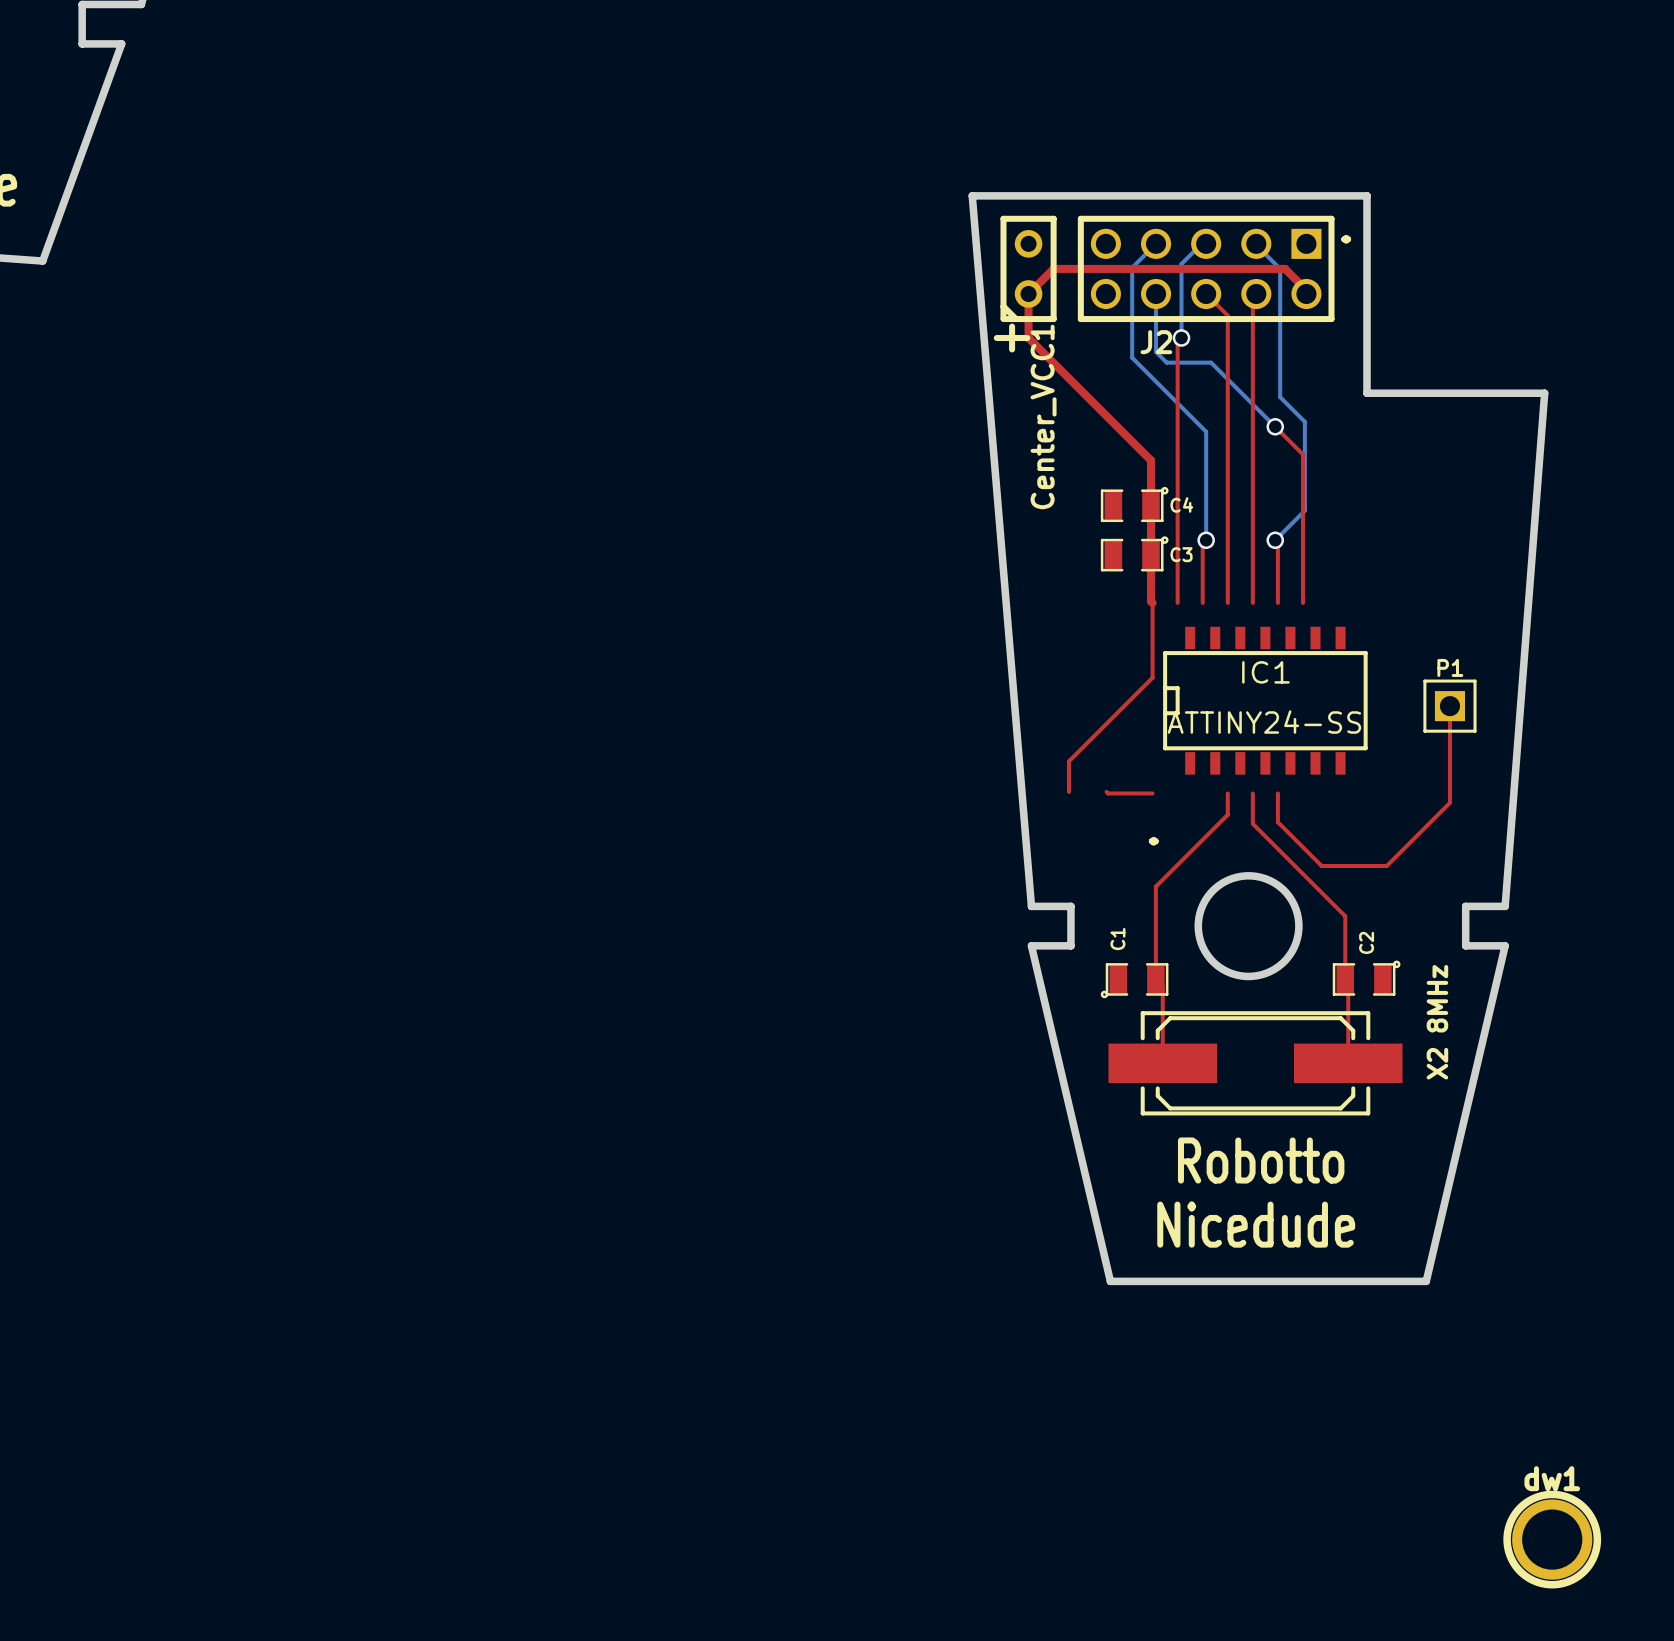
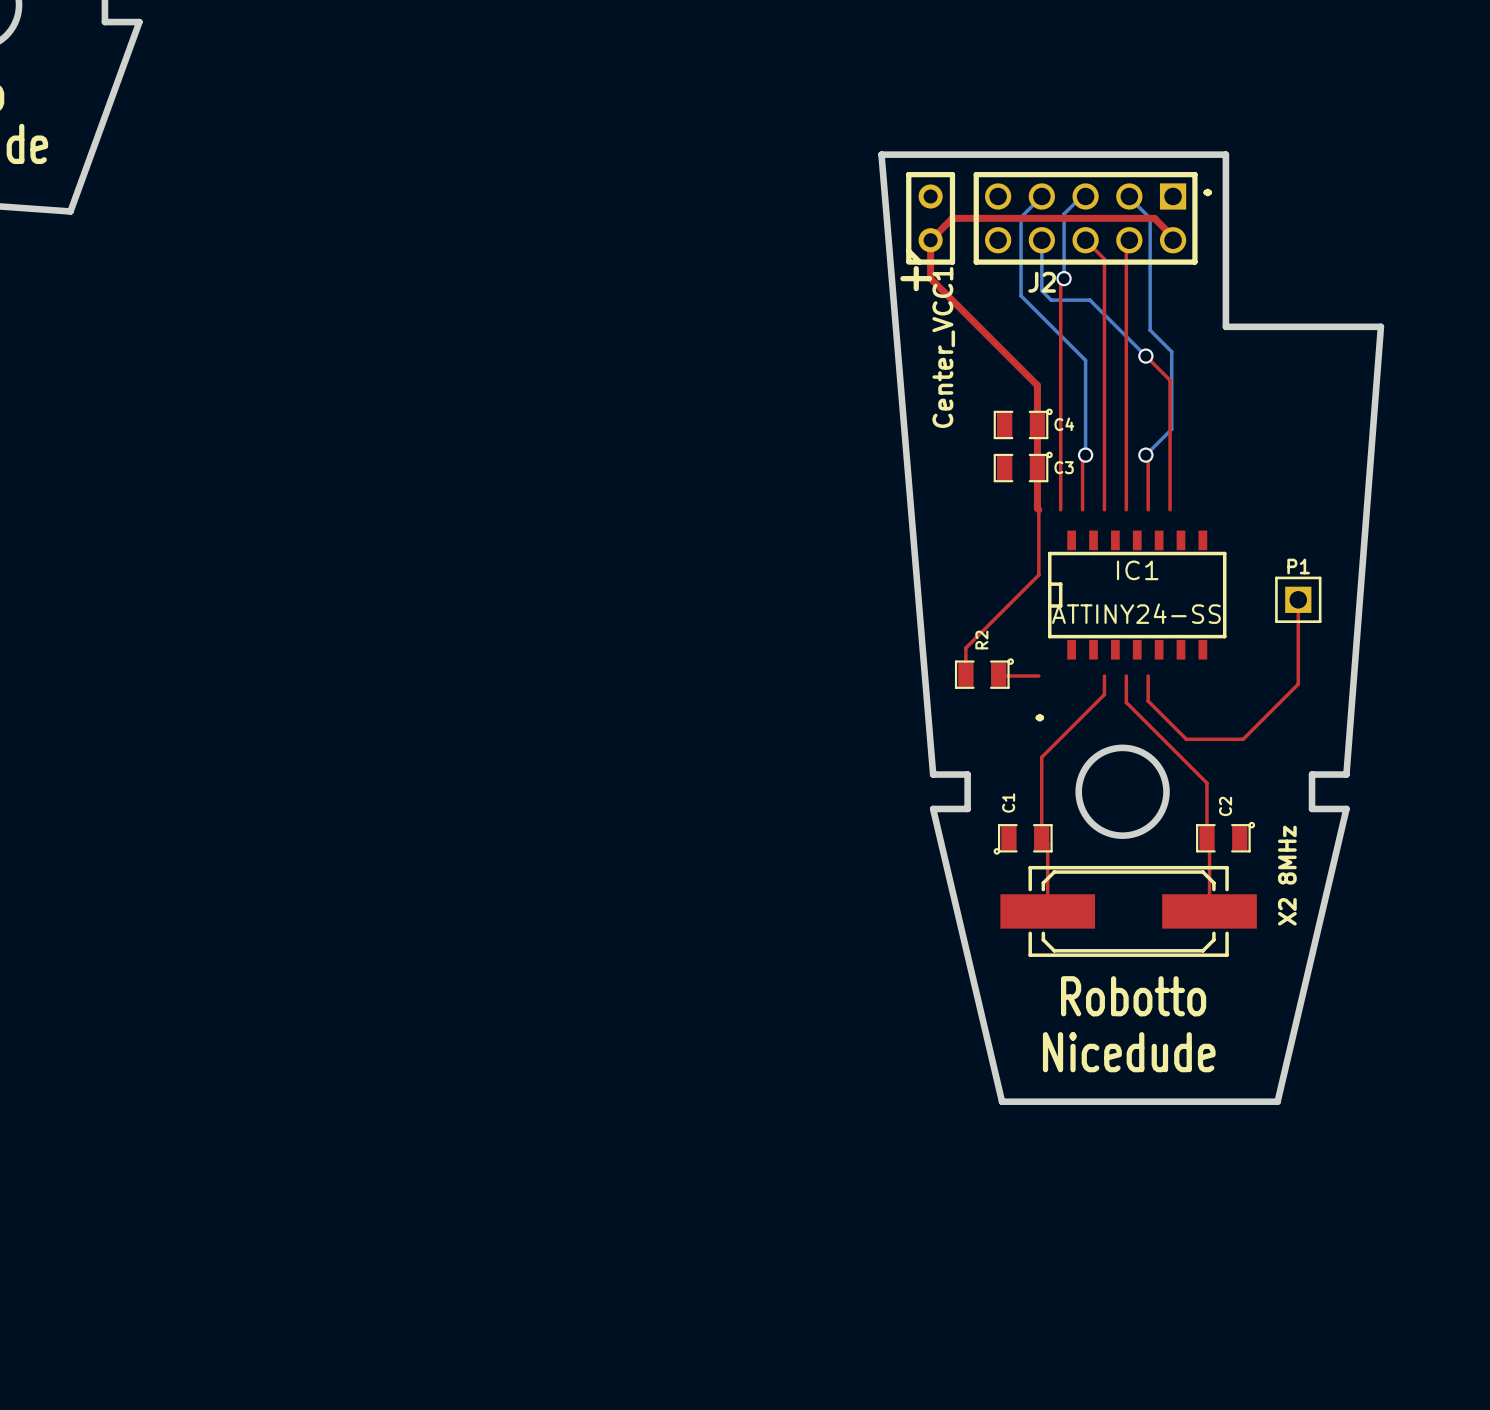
R2: none -> (984, 673)
dw1: (1552, 1539) -> none

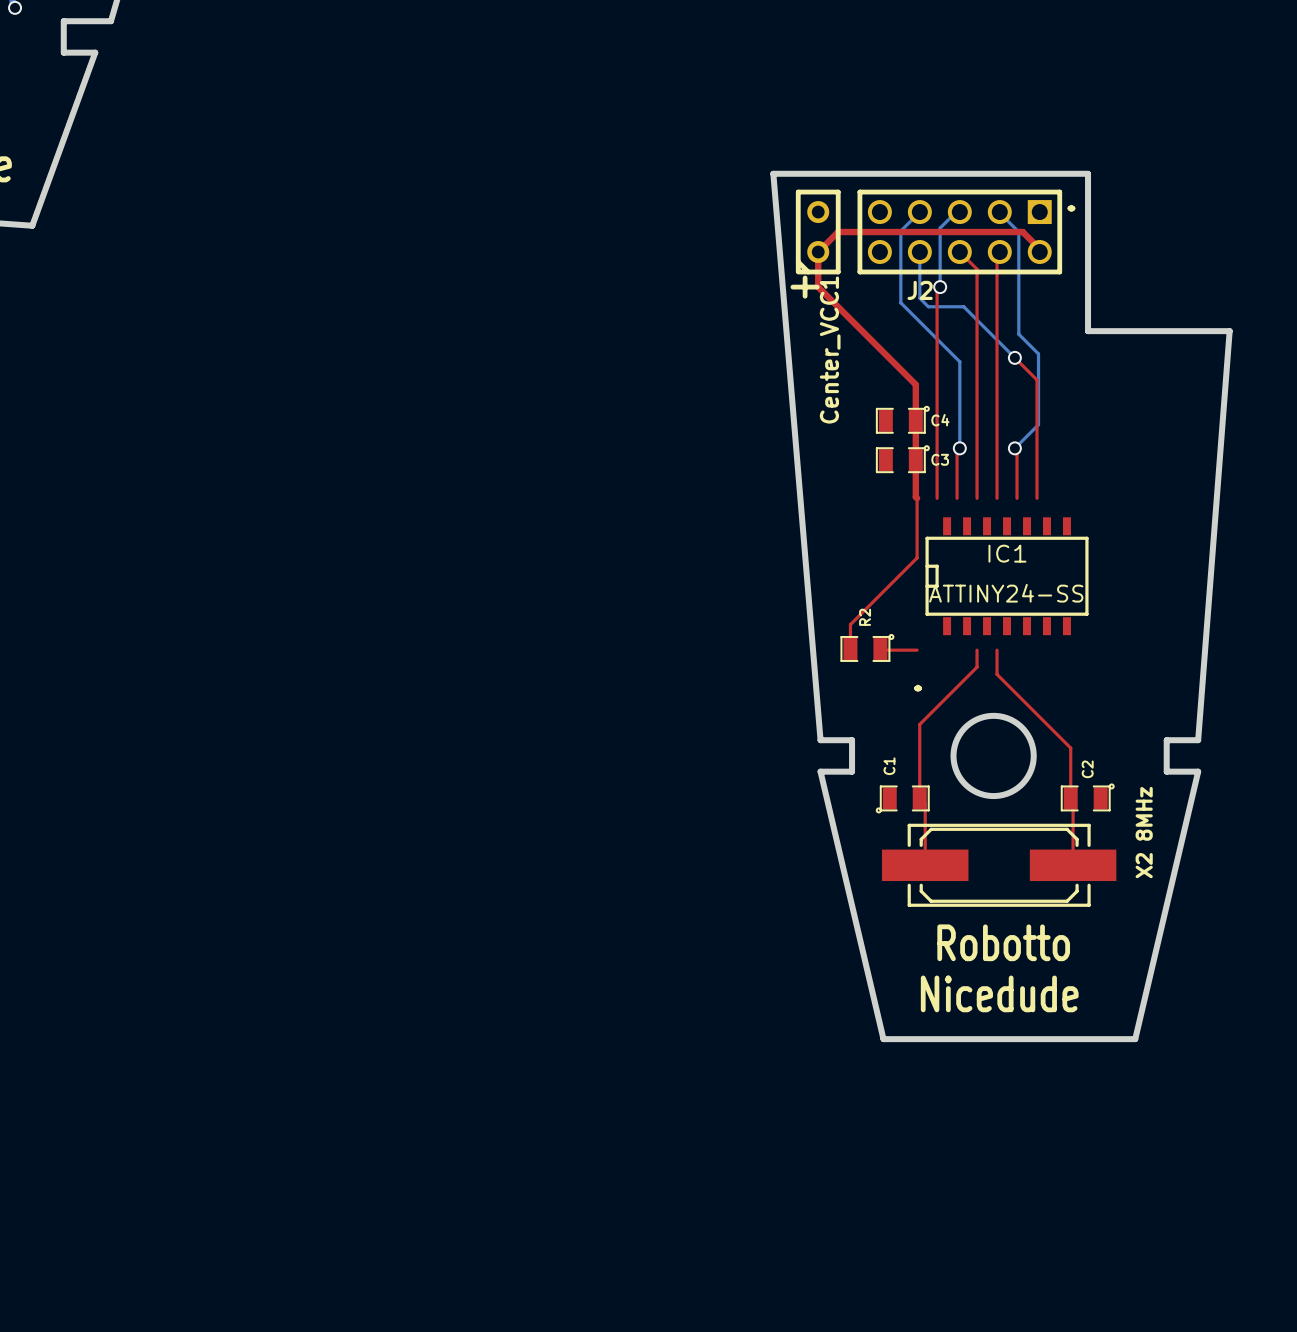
top track: (1298, 599) (1298, 684) (1243, 739) (1186, 739) (1148, 701) (1148, 675) -> none
P1: (1298, 599) -> none

